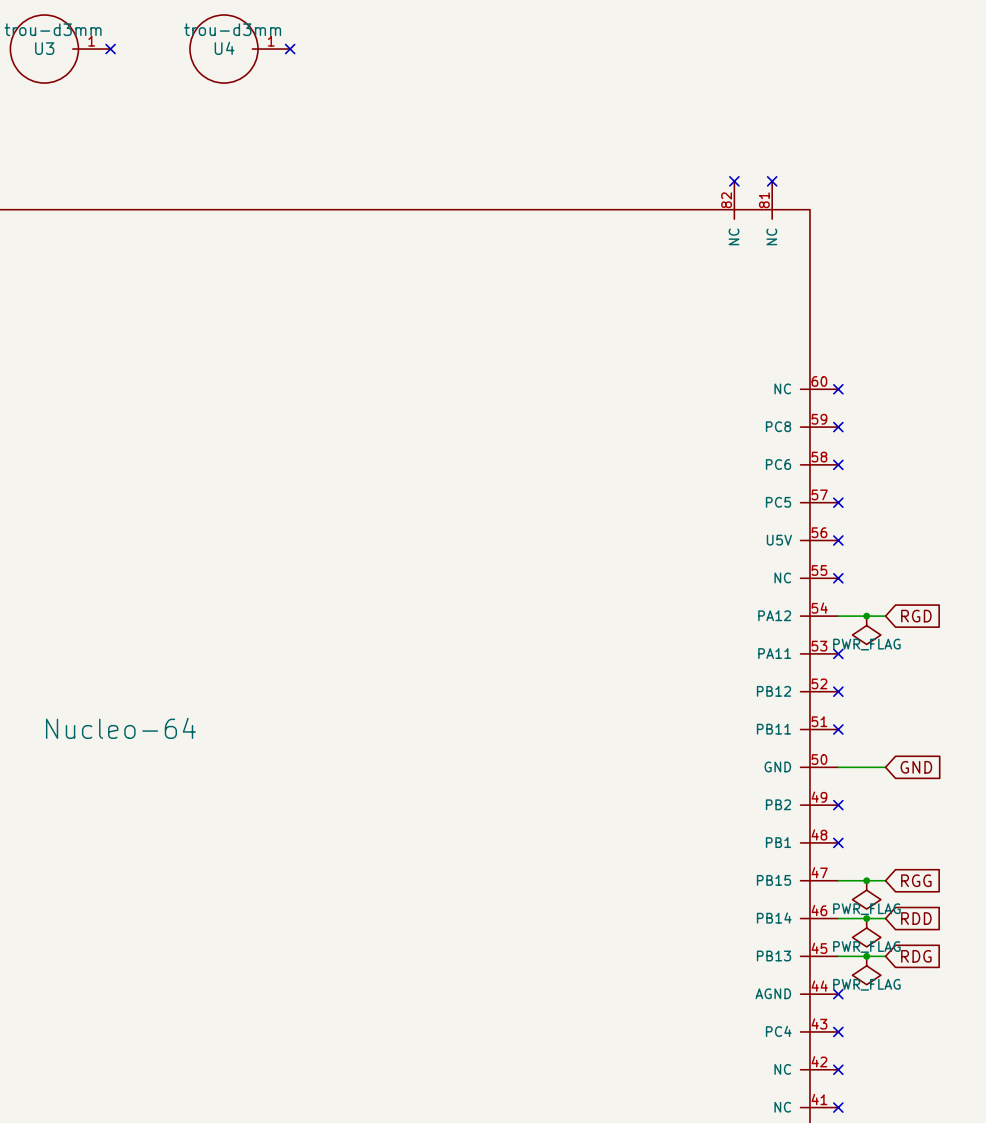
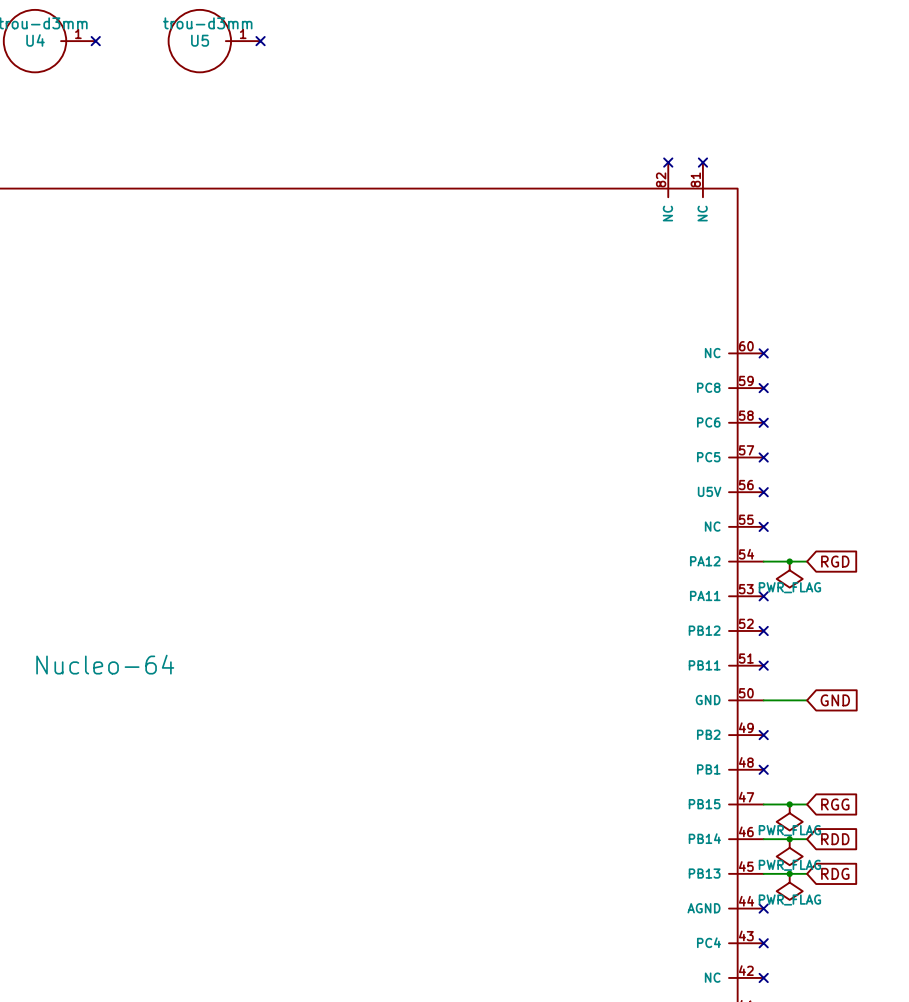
U3 name: U3 (44, 48) -> U4 (35, 40)
U4 name: U4 (224, 48) -> U5 (200, 40)

